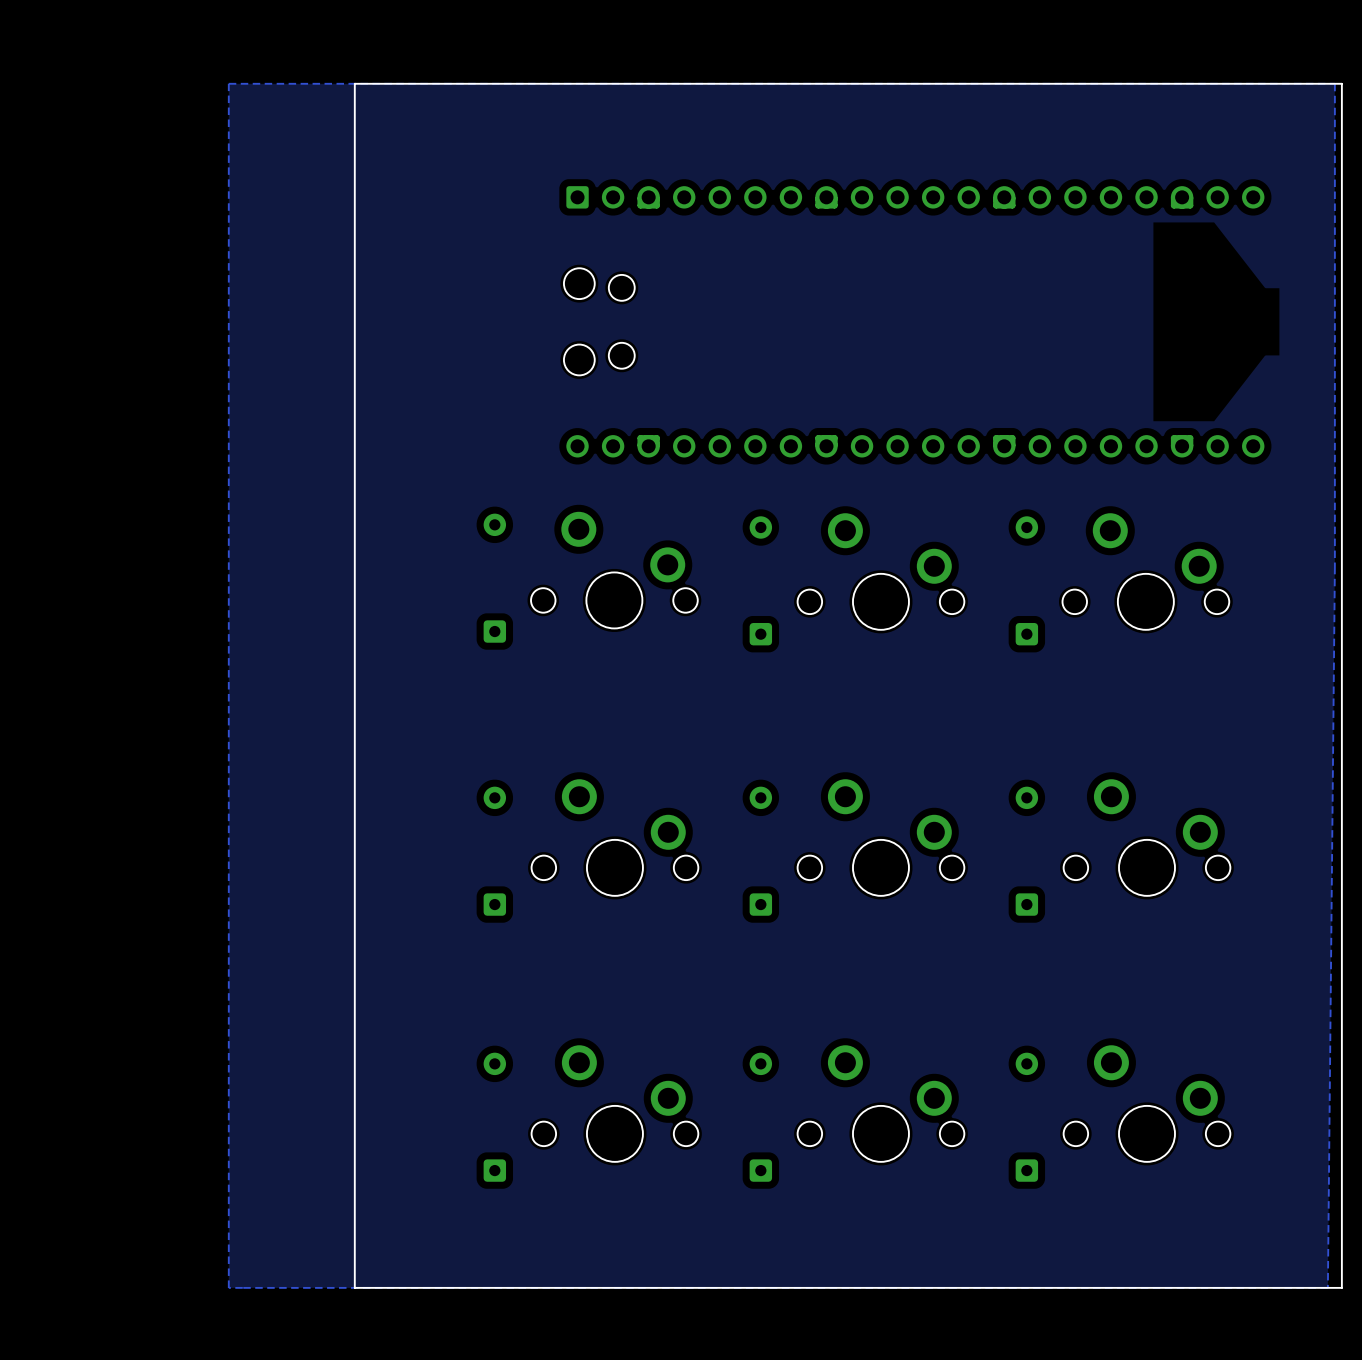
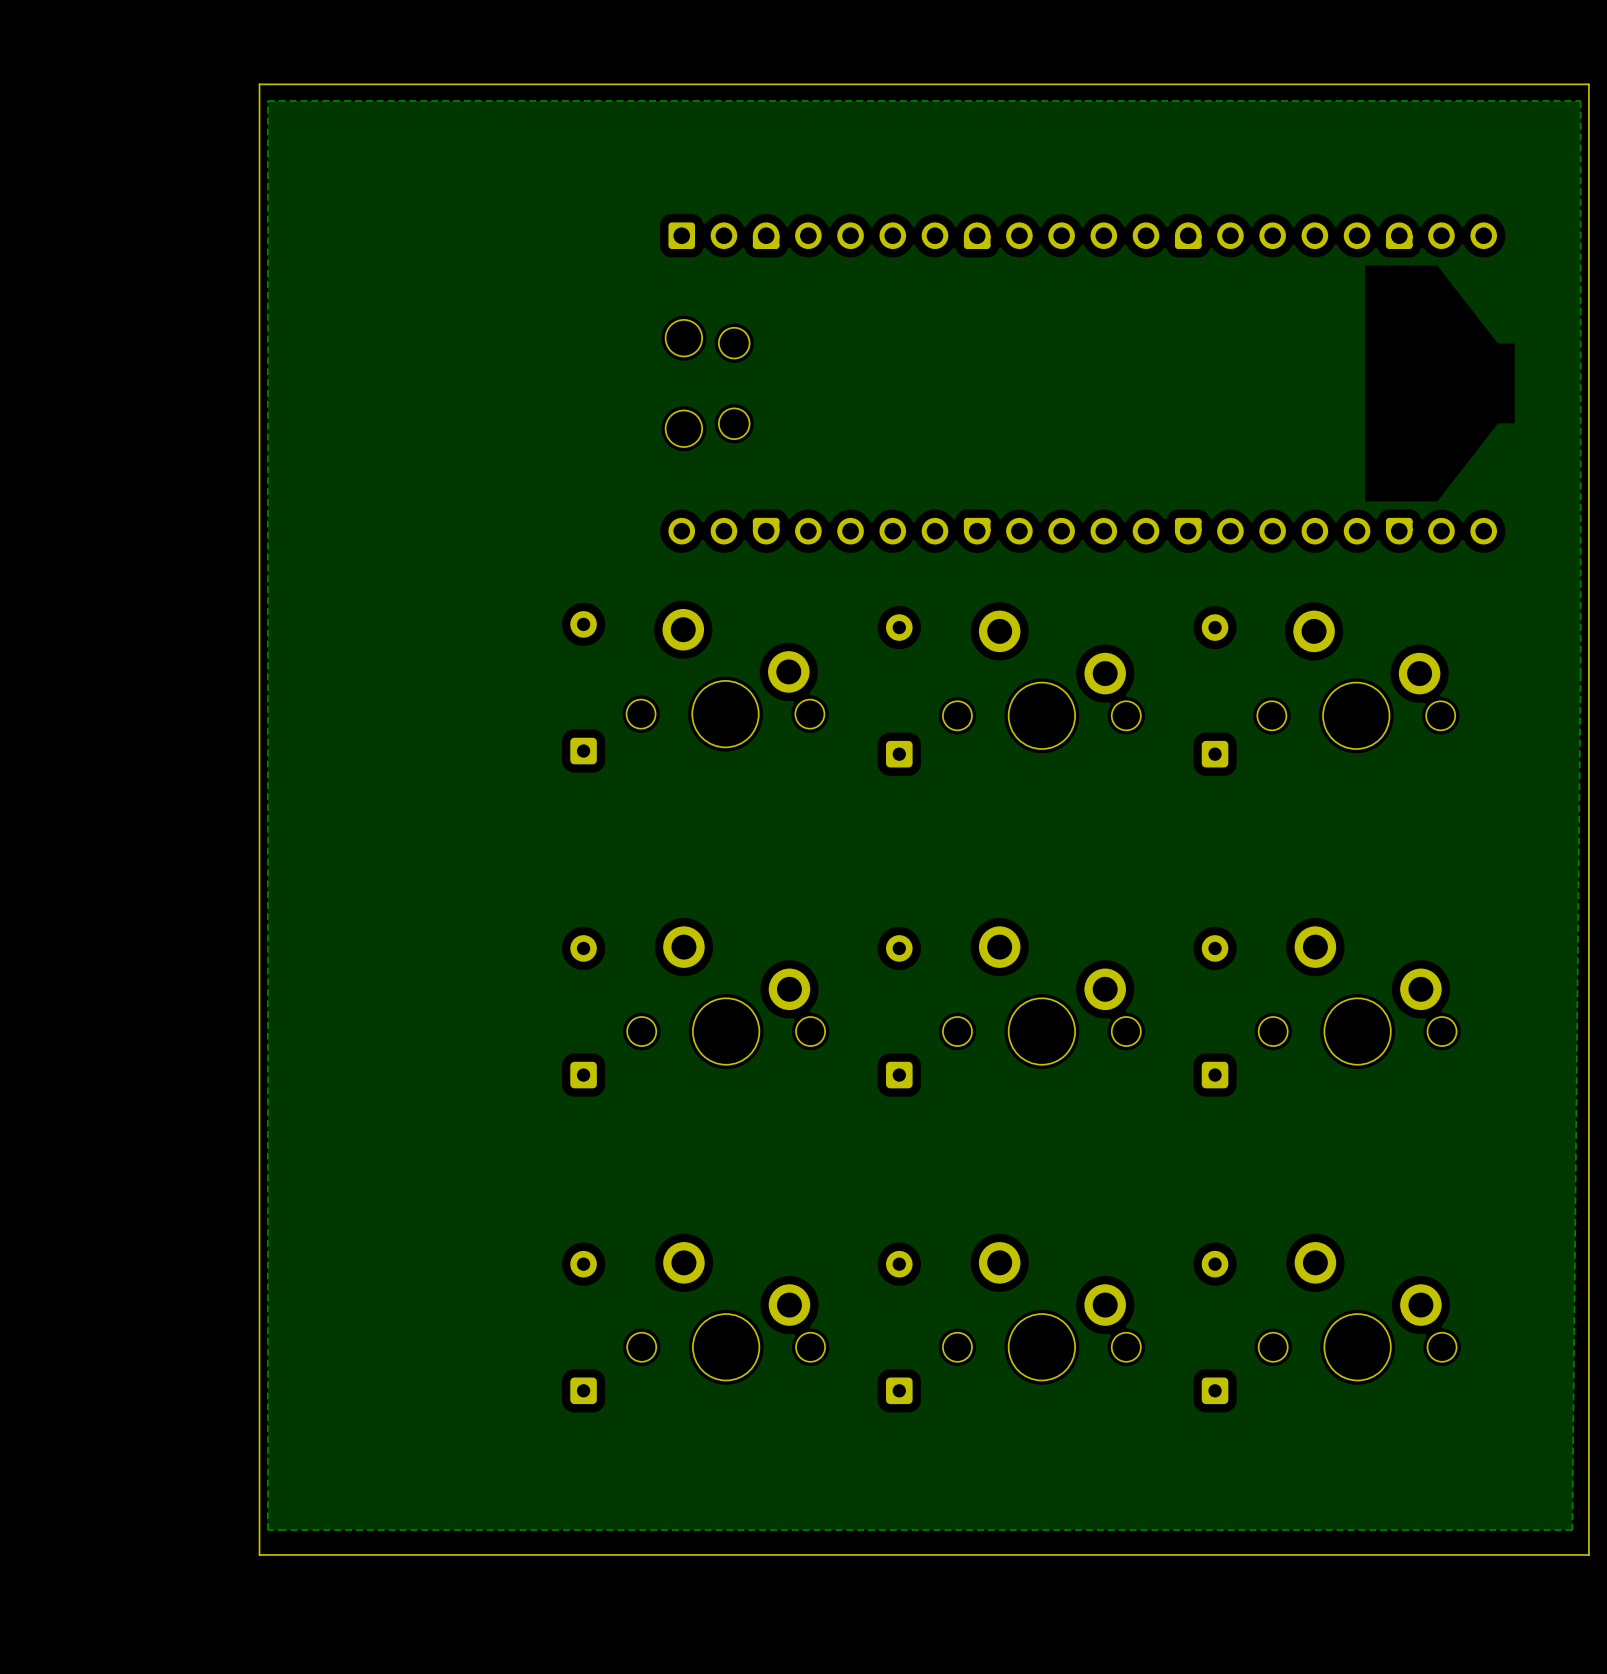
board edge: (1341, 83) (354, 83) (354, 1287) (1341, 1287) -> (1588, 100) (1588, 84) (259, 84) (259, 1554) (1588, 1554) (1588, 1530)

